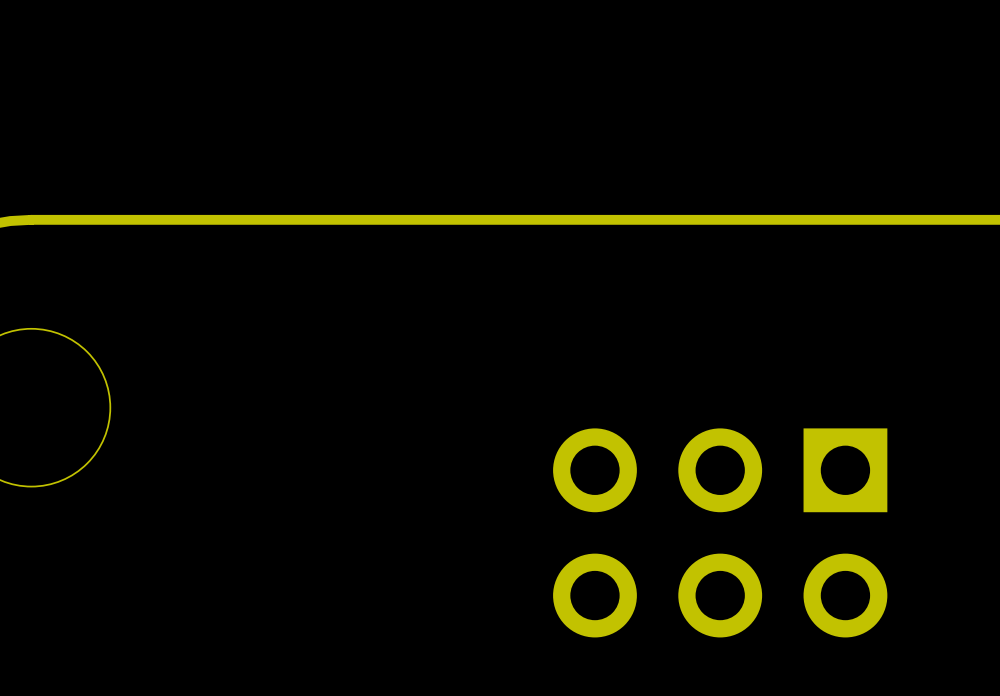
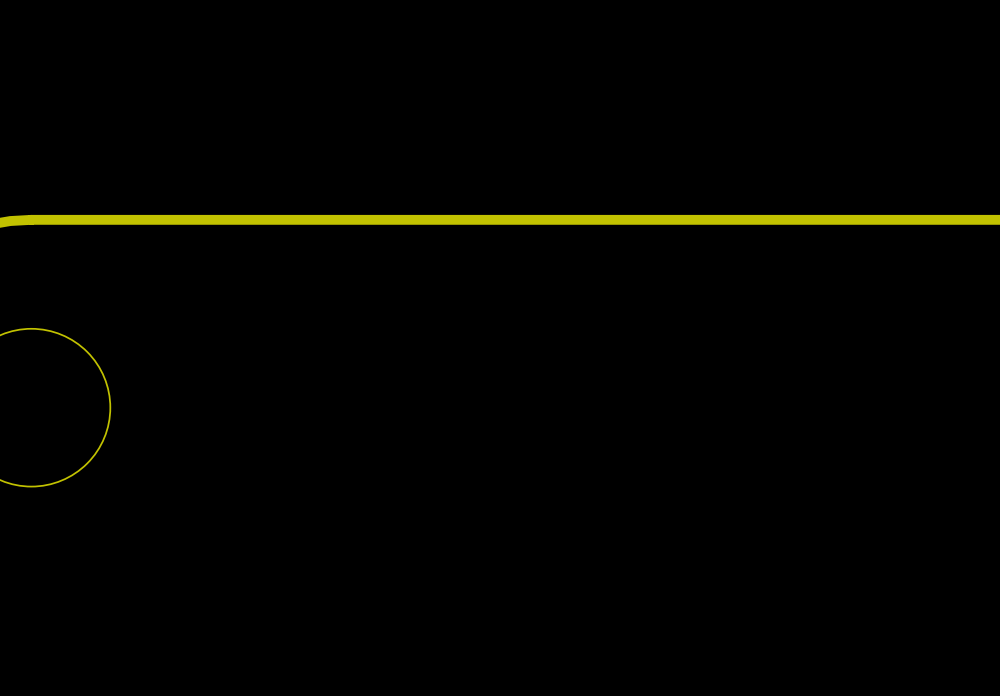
part: (720, 532) -> none

